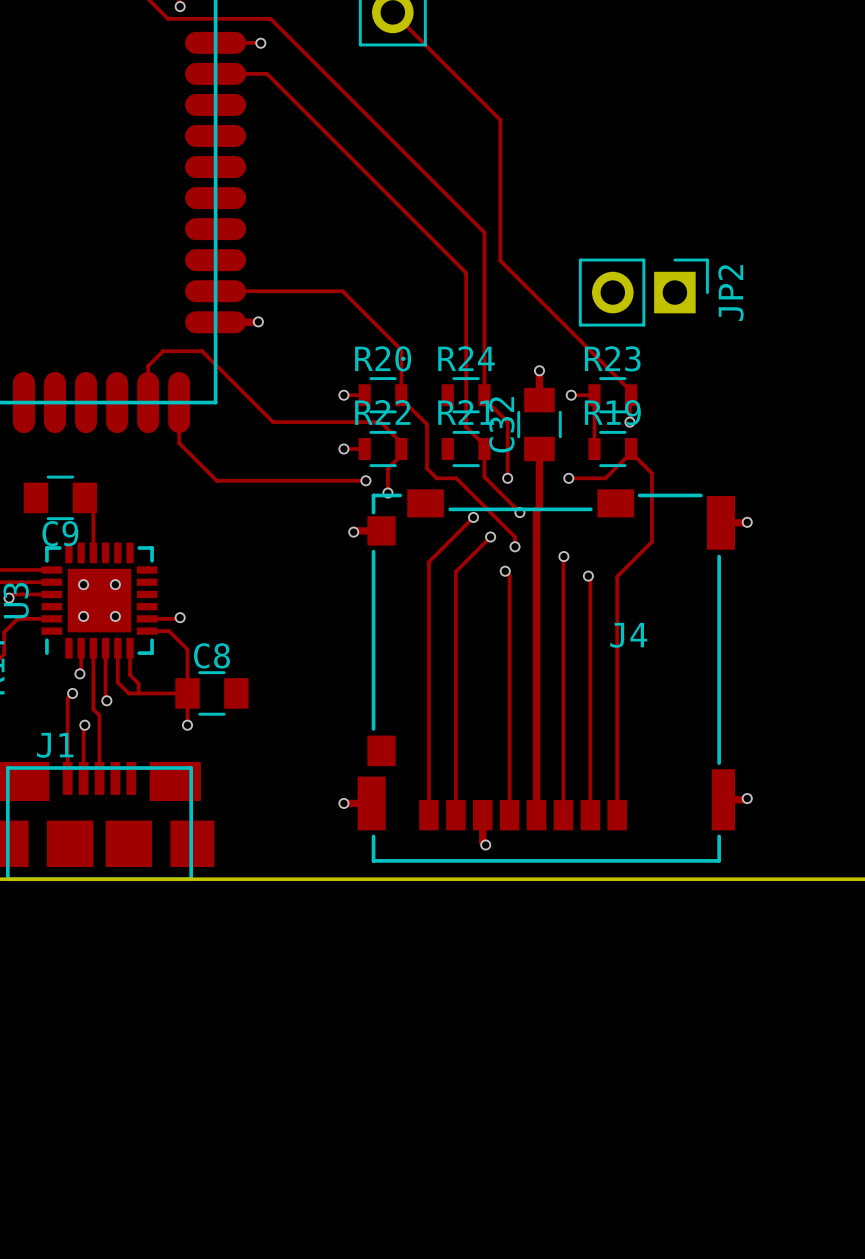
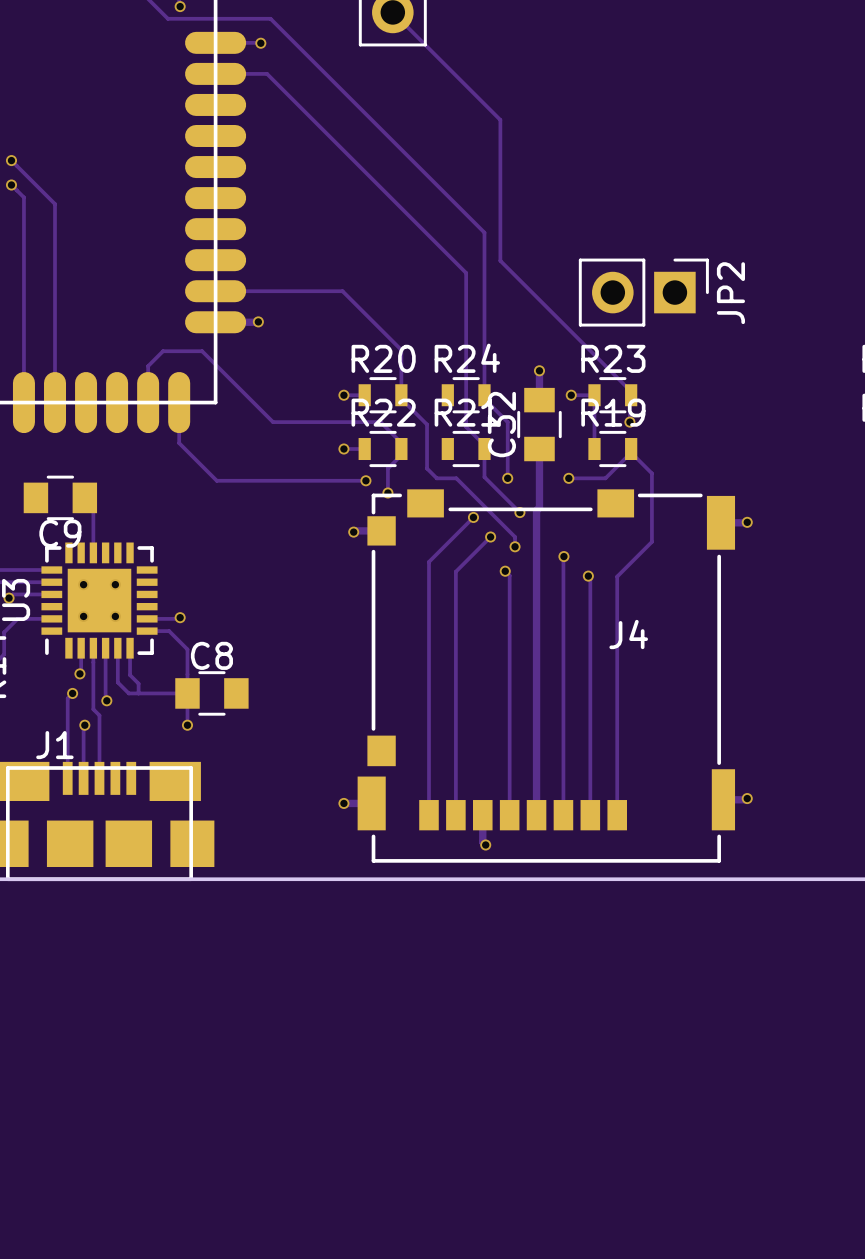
track: none -> (11, 160) (55, 204) (55, 402)
via: none -> (11, 160)
track: none -> (11, 185) (23, 197) (23, 402)
via: none -> (11, 185)

